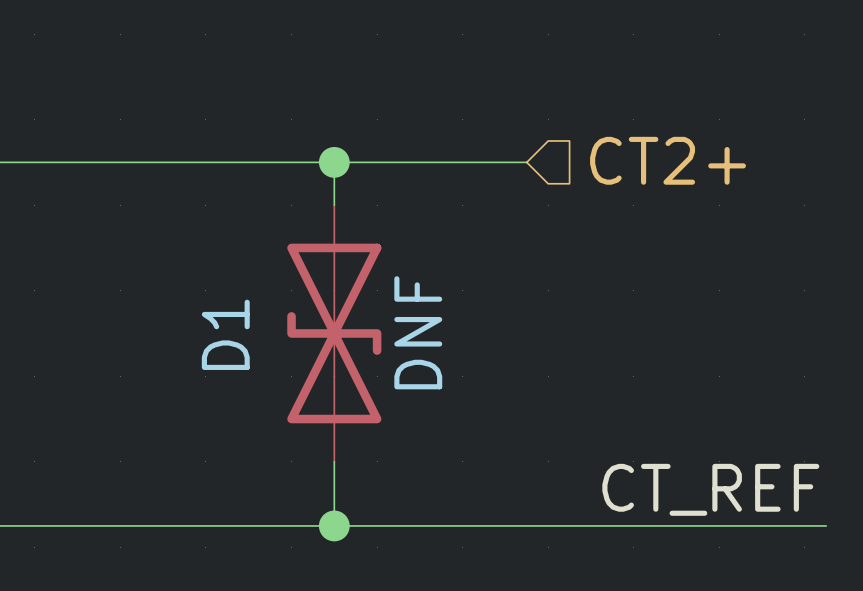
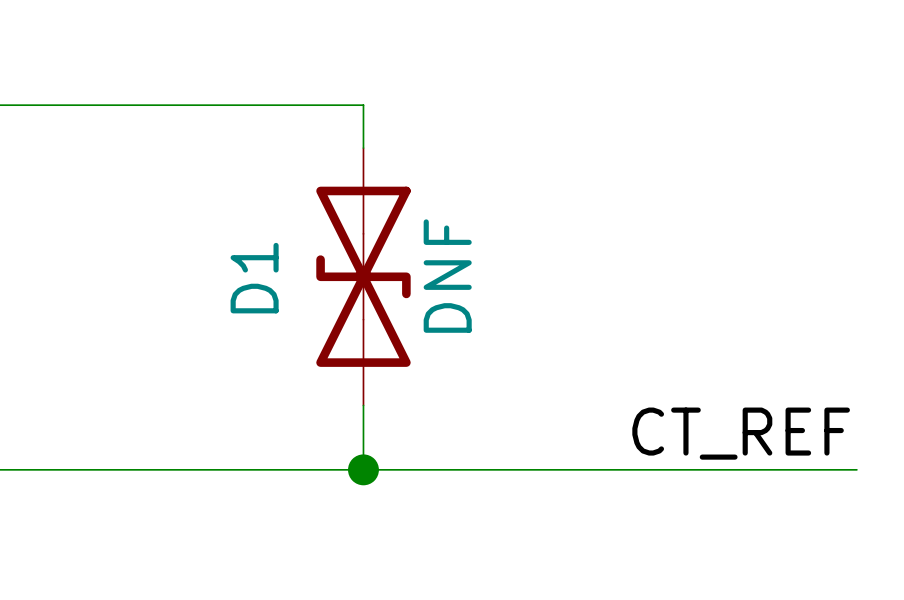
hierarchical label: CT2+ (668, 160) -> none
wire: (334, 162) (526, 162) -> none
junction: (334, 162) -> none

